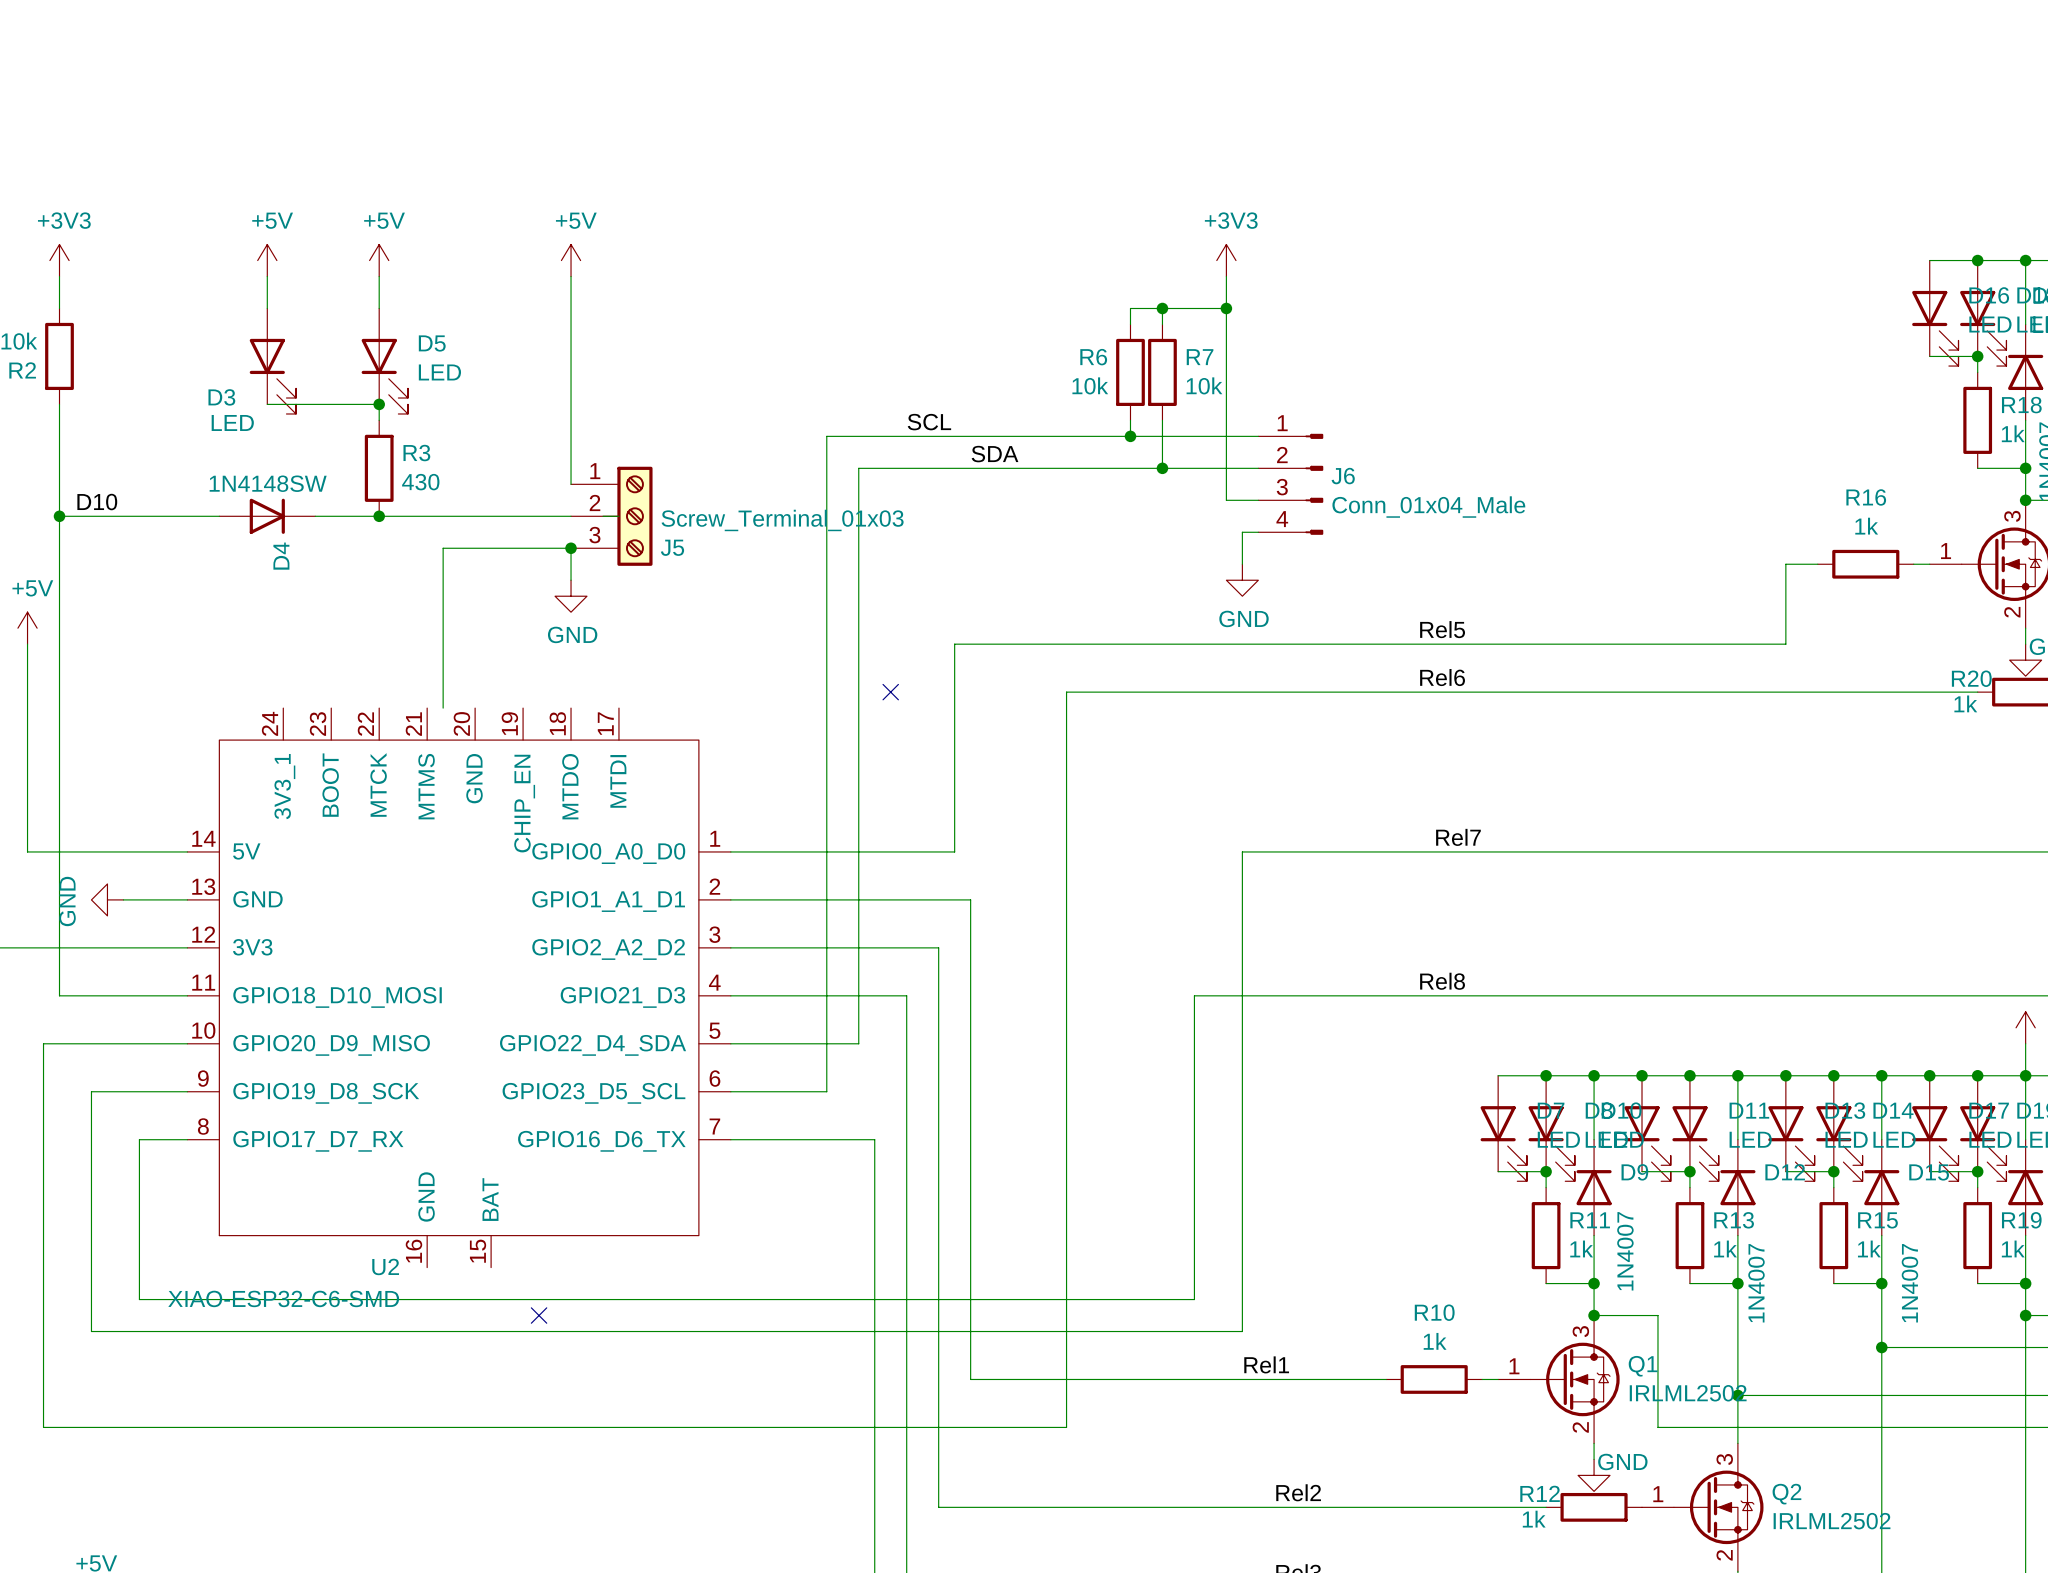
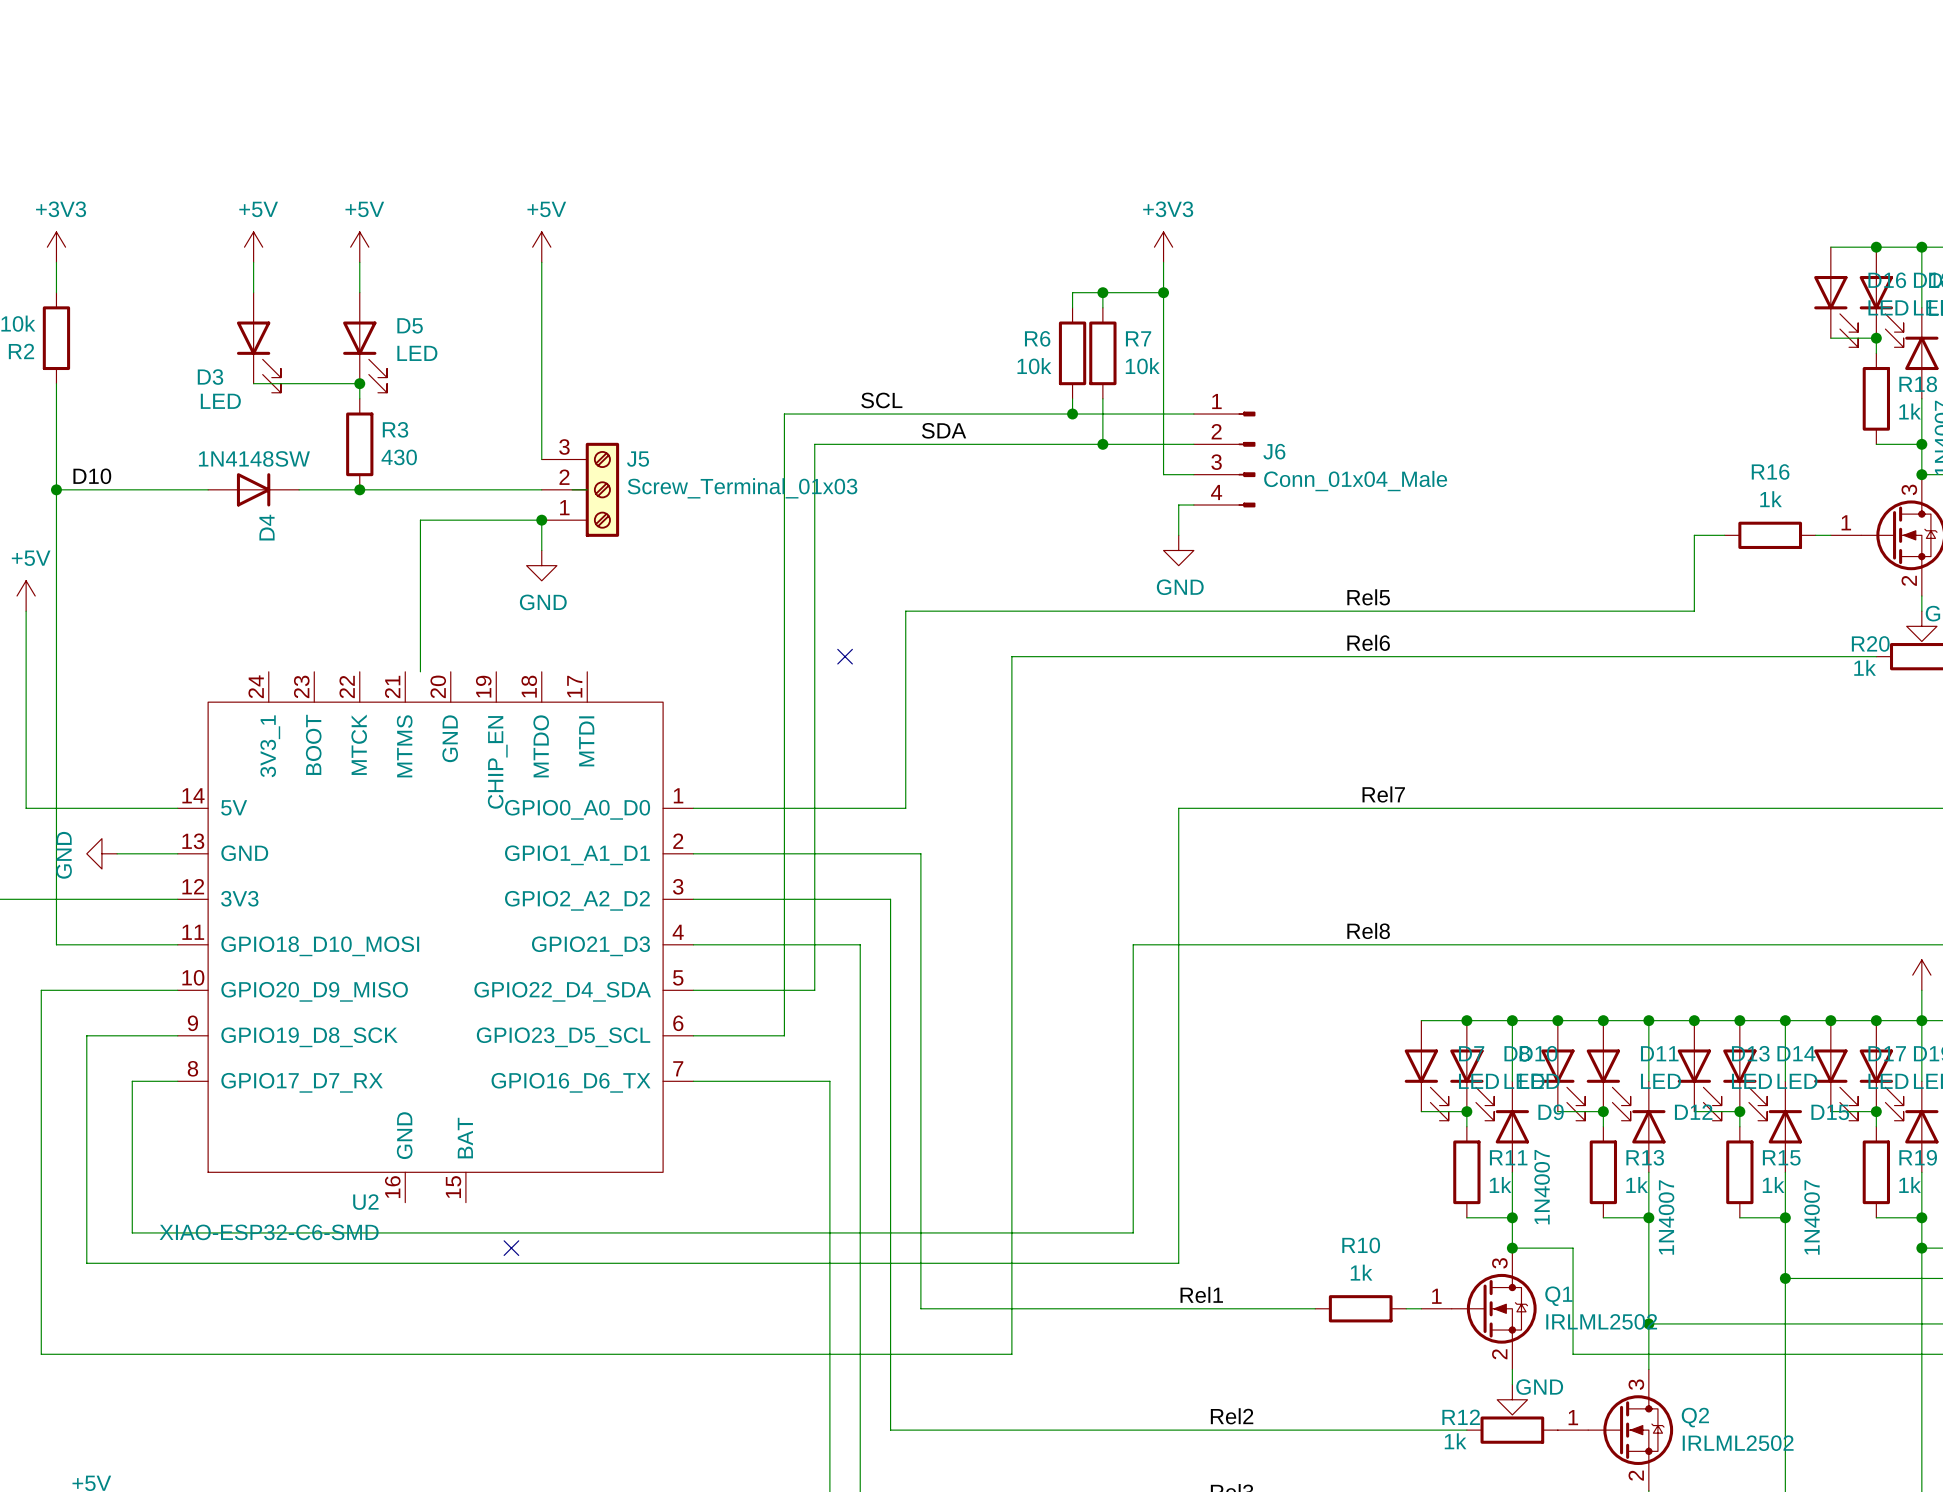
J5 flip: as is (634, 516) -> up-down (602, 489)

